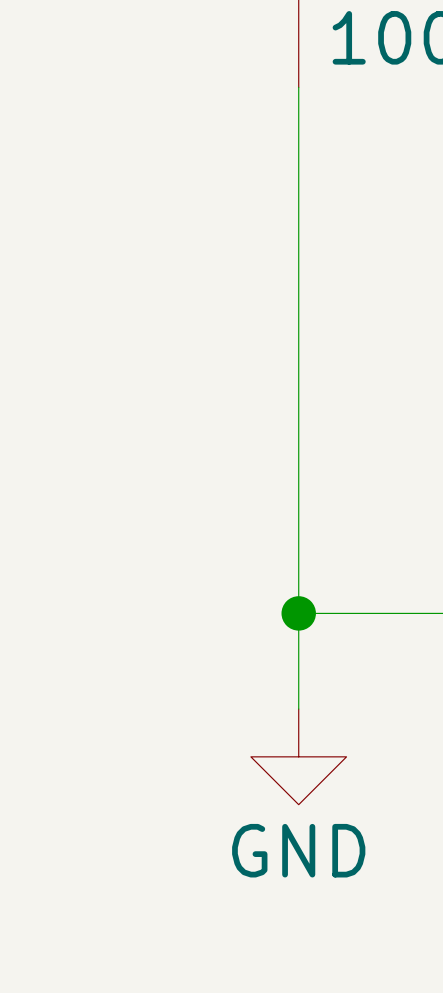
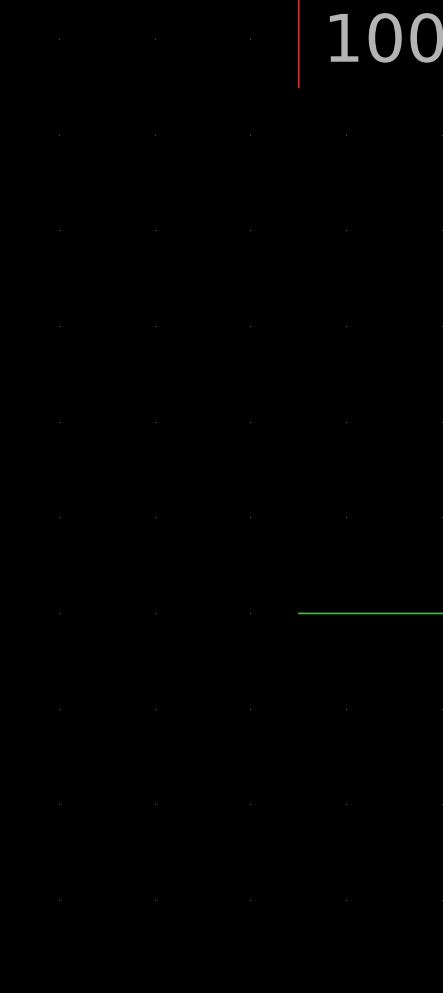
wire: (298, 87) (298, 709) -> none
junction: (298, 613) -> none
power symbol: GND (298, 756) -> none

